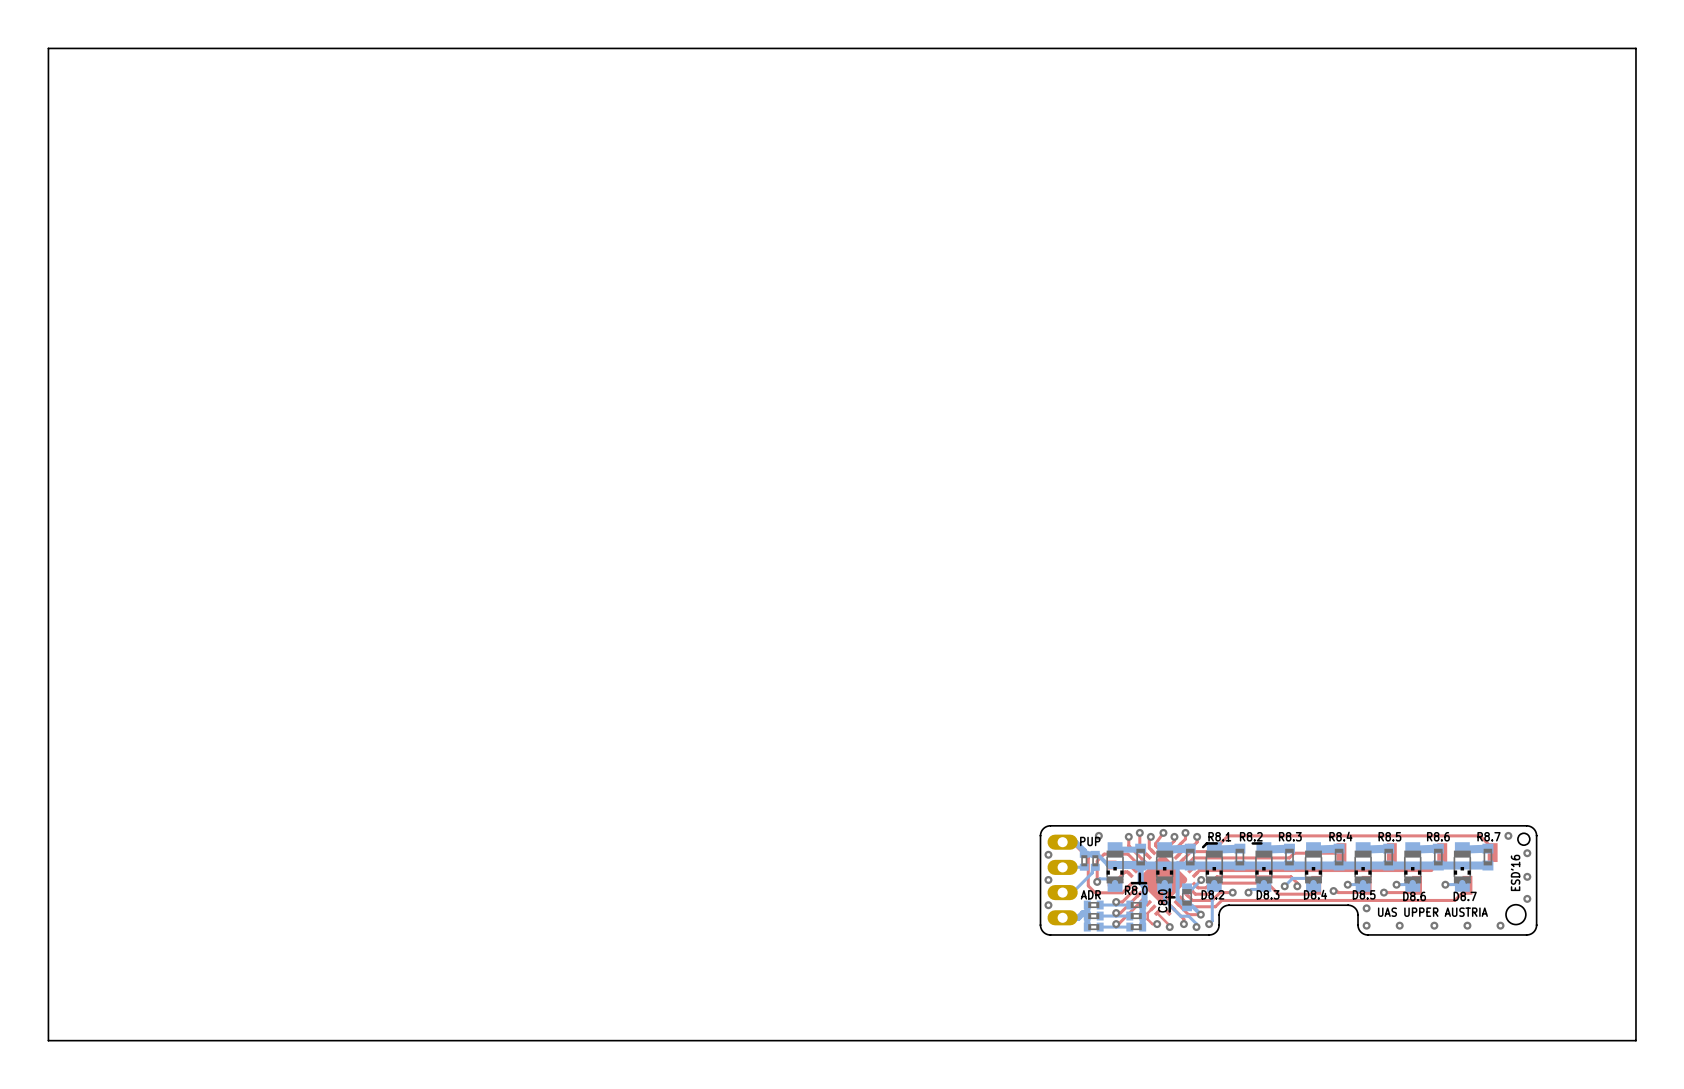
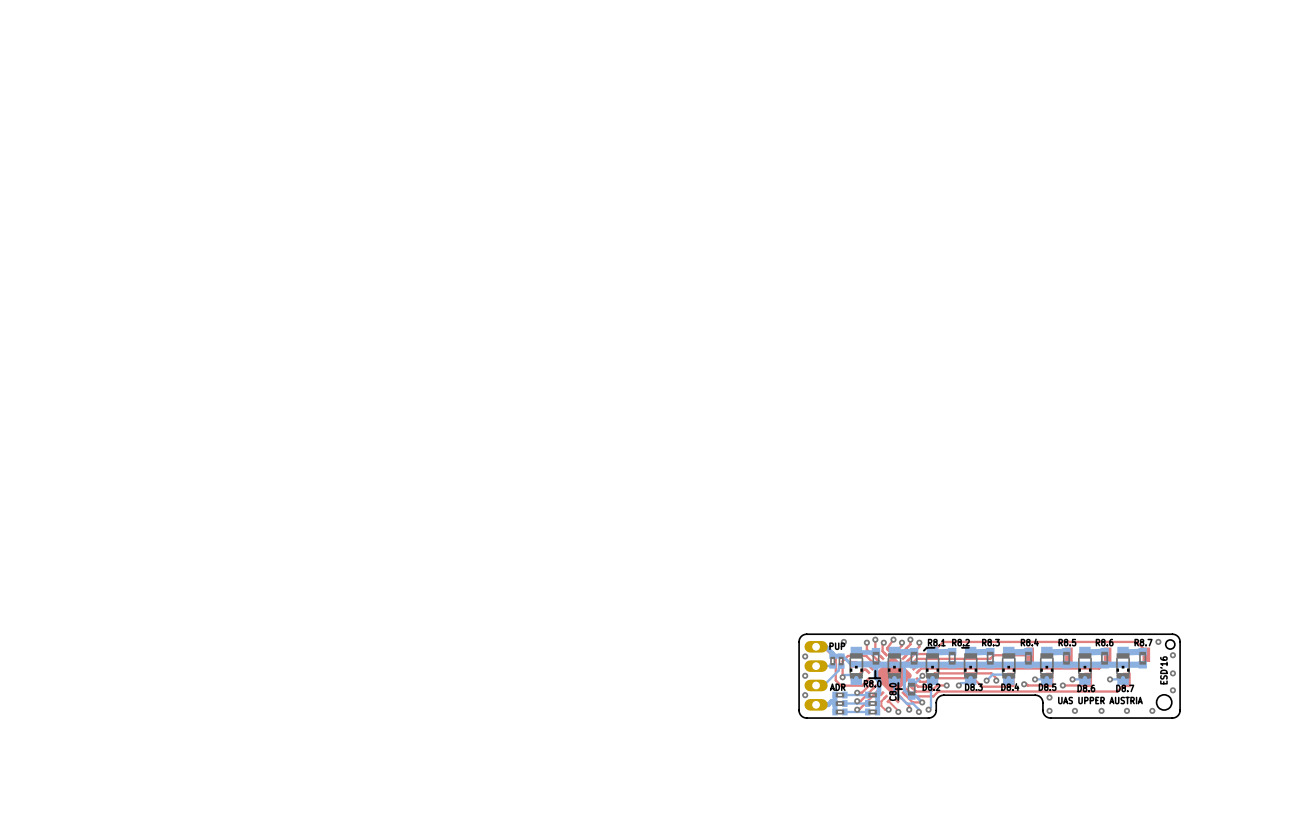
board edge: (1635, 48) (48, 48) (48, 1040) (1635, 1040) (1635, 48) -> none

